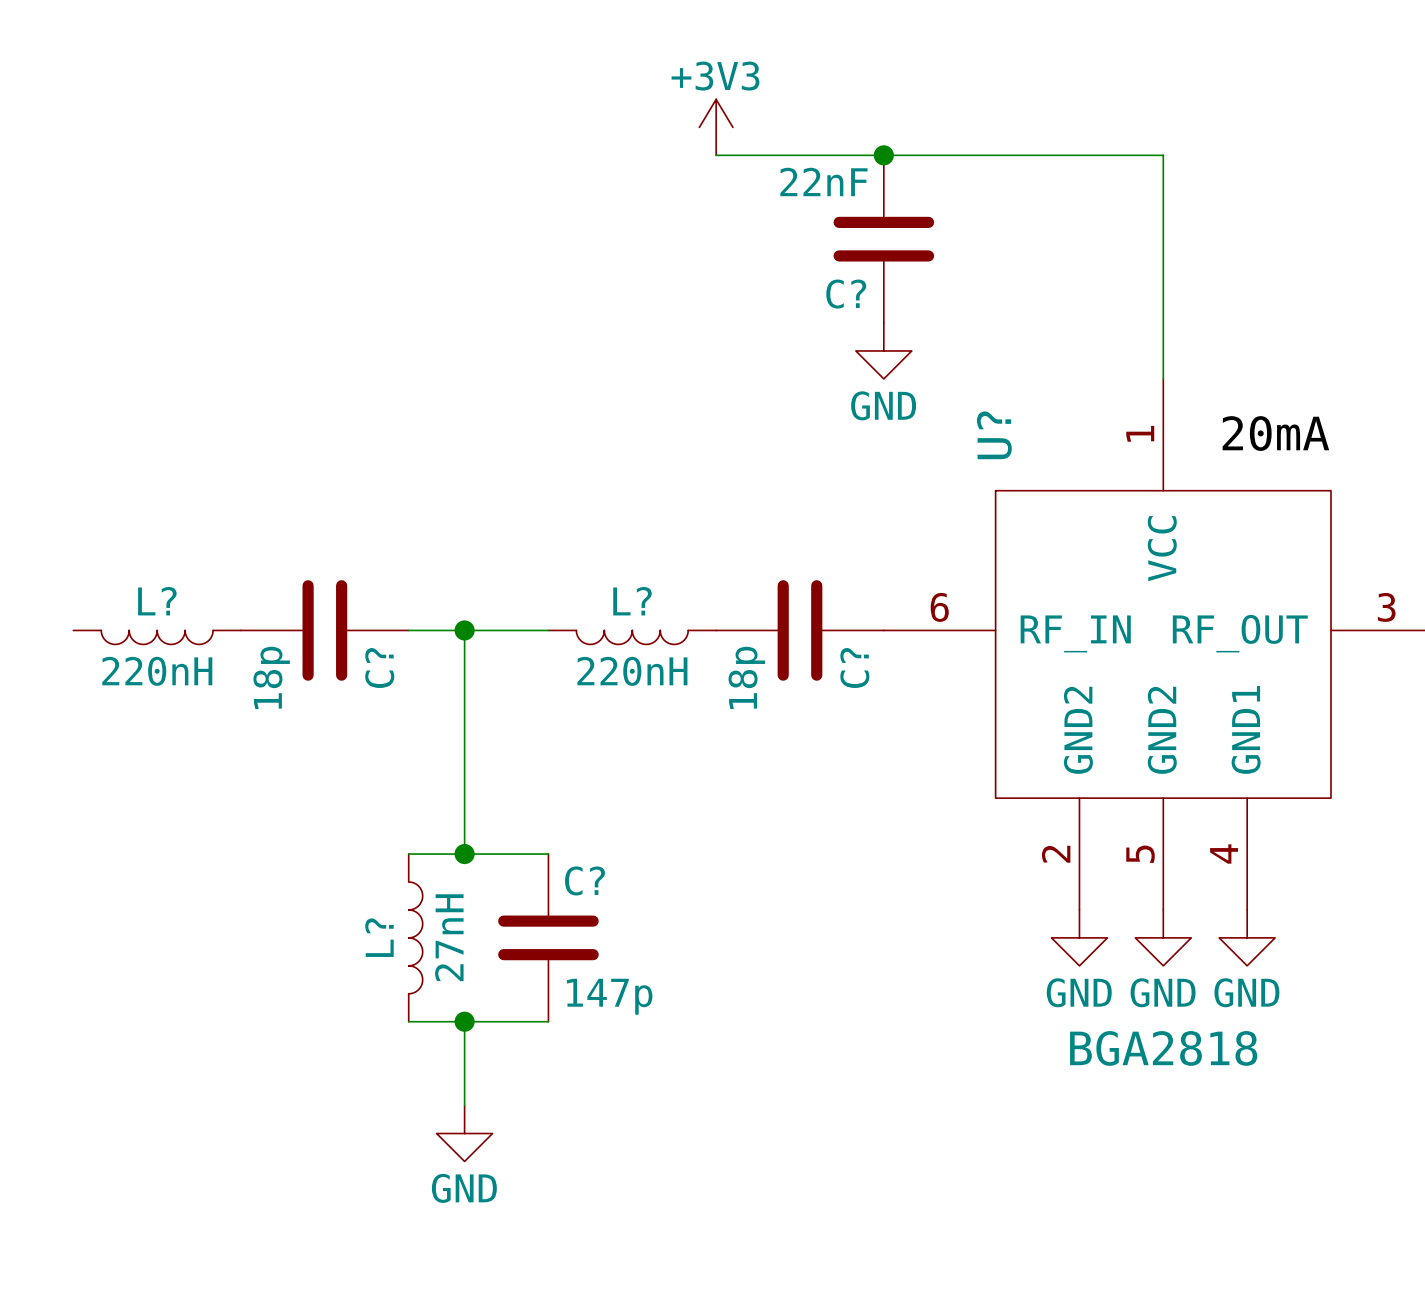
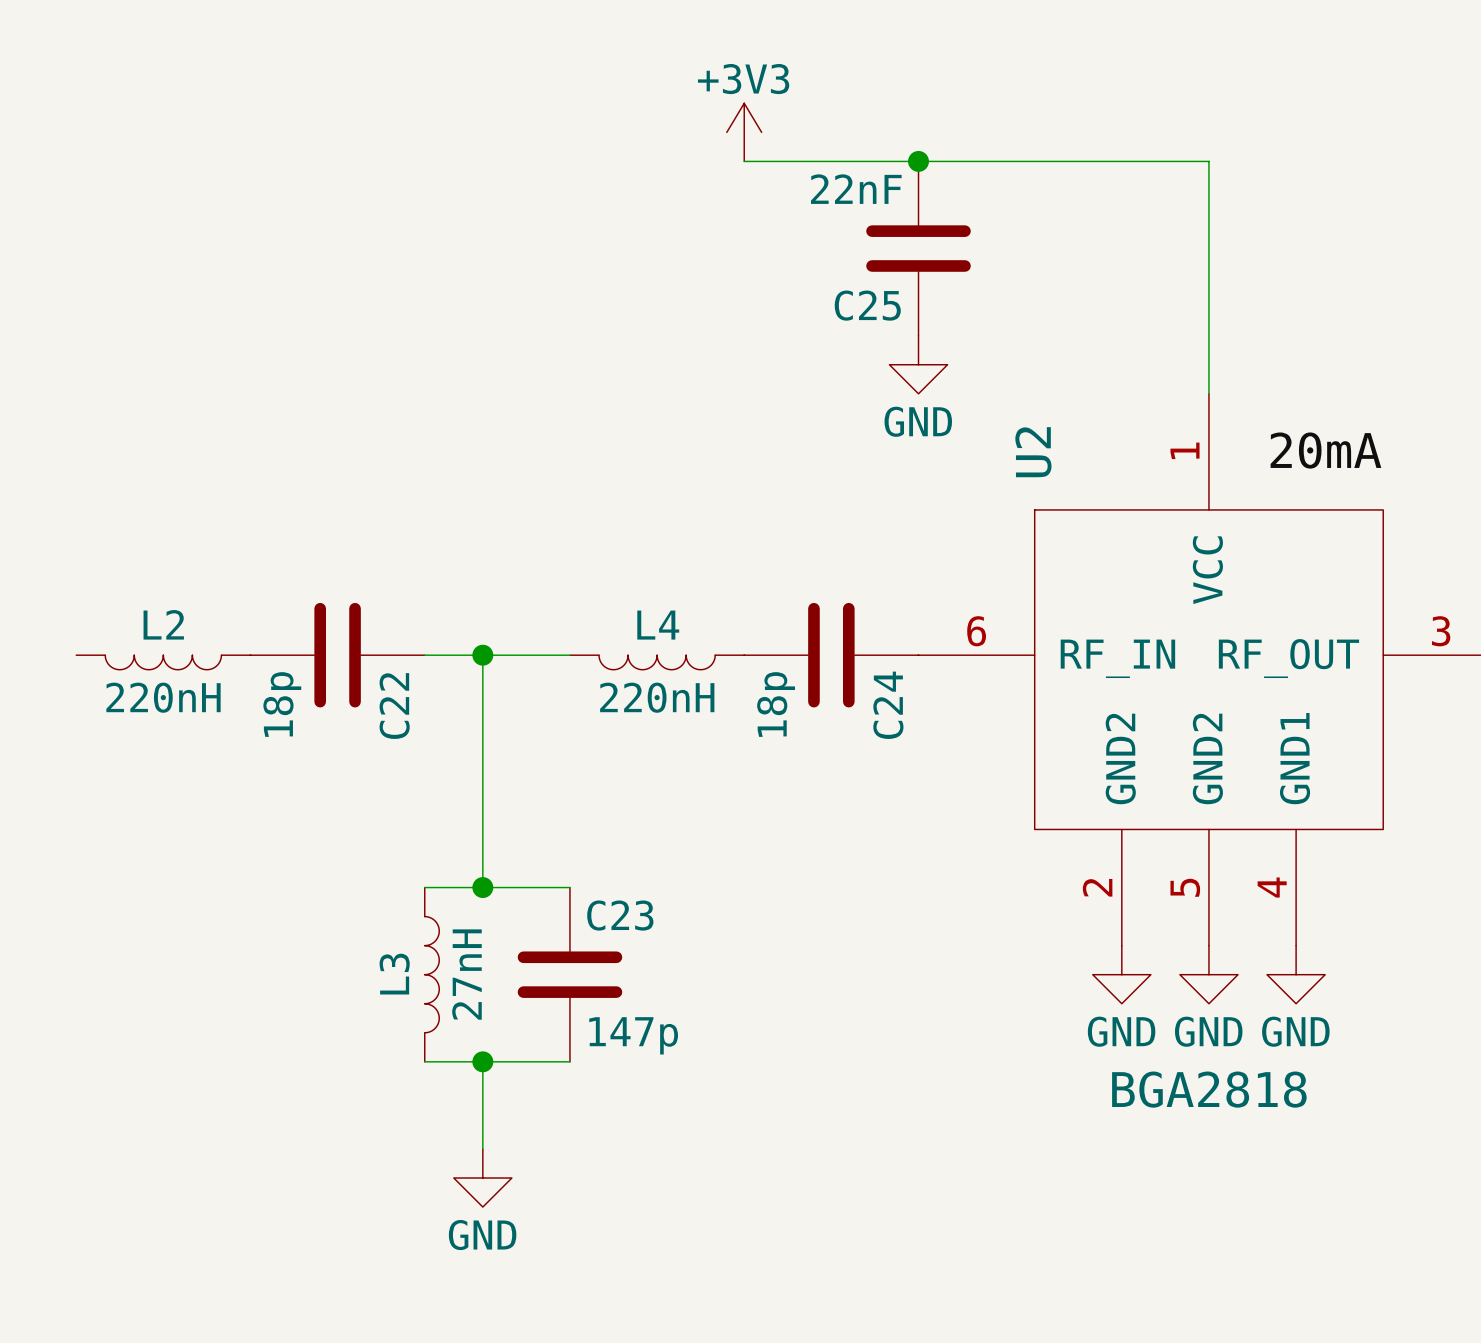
C? name: C? (846, 294) -> C25 (867, 305)
U? name: U? (994, 435) -> U2 (1033, 452)
L? name: L? (157, 601) -> L2 (163, 624)
L? name: L? (632, 601) -> L4 (658, 625)
C? name: C? (379, 668) -> C22 (394, 706)
C? name: C? (854, 668) -> C24 (888, 705)
C? name: C? (584, 880) -> C23 (620, 915)
L? name: L? (379, 937) -> L3 (394, 974)

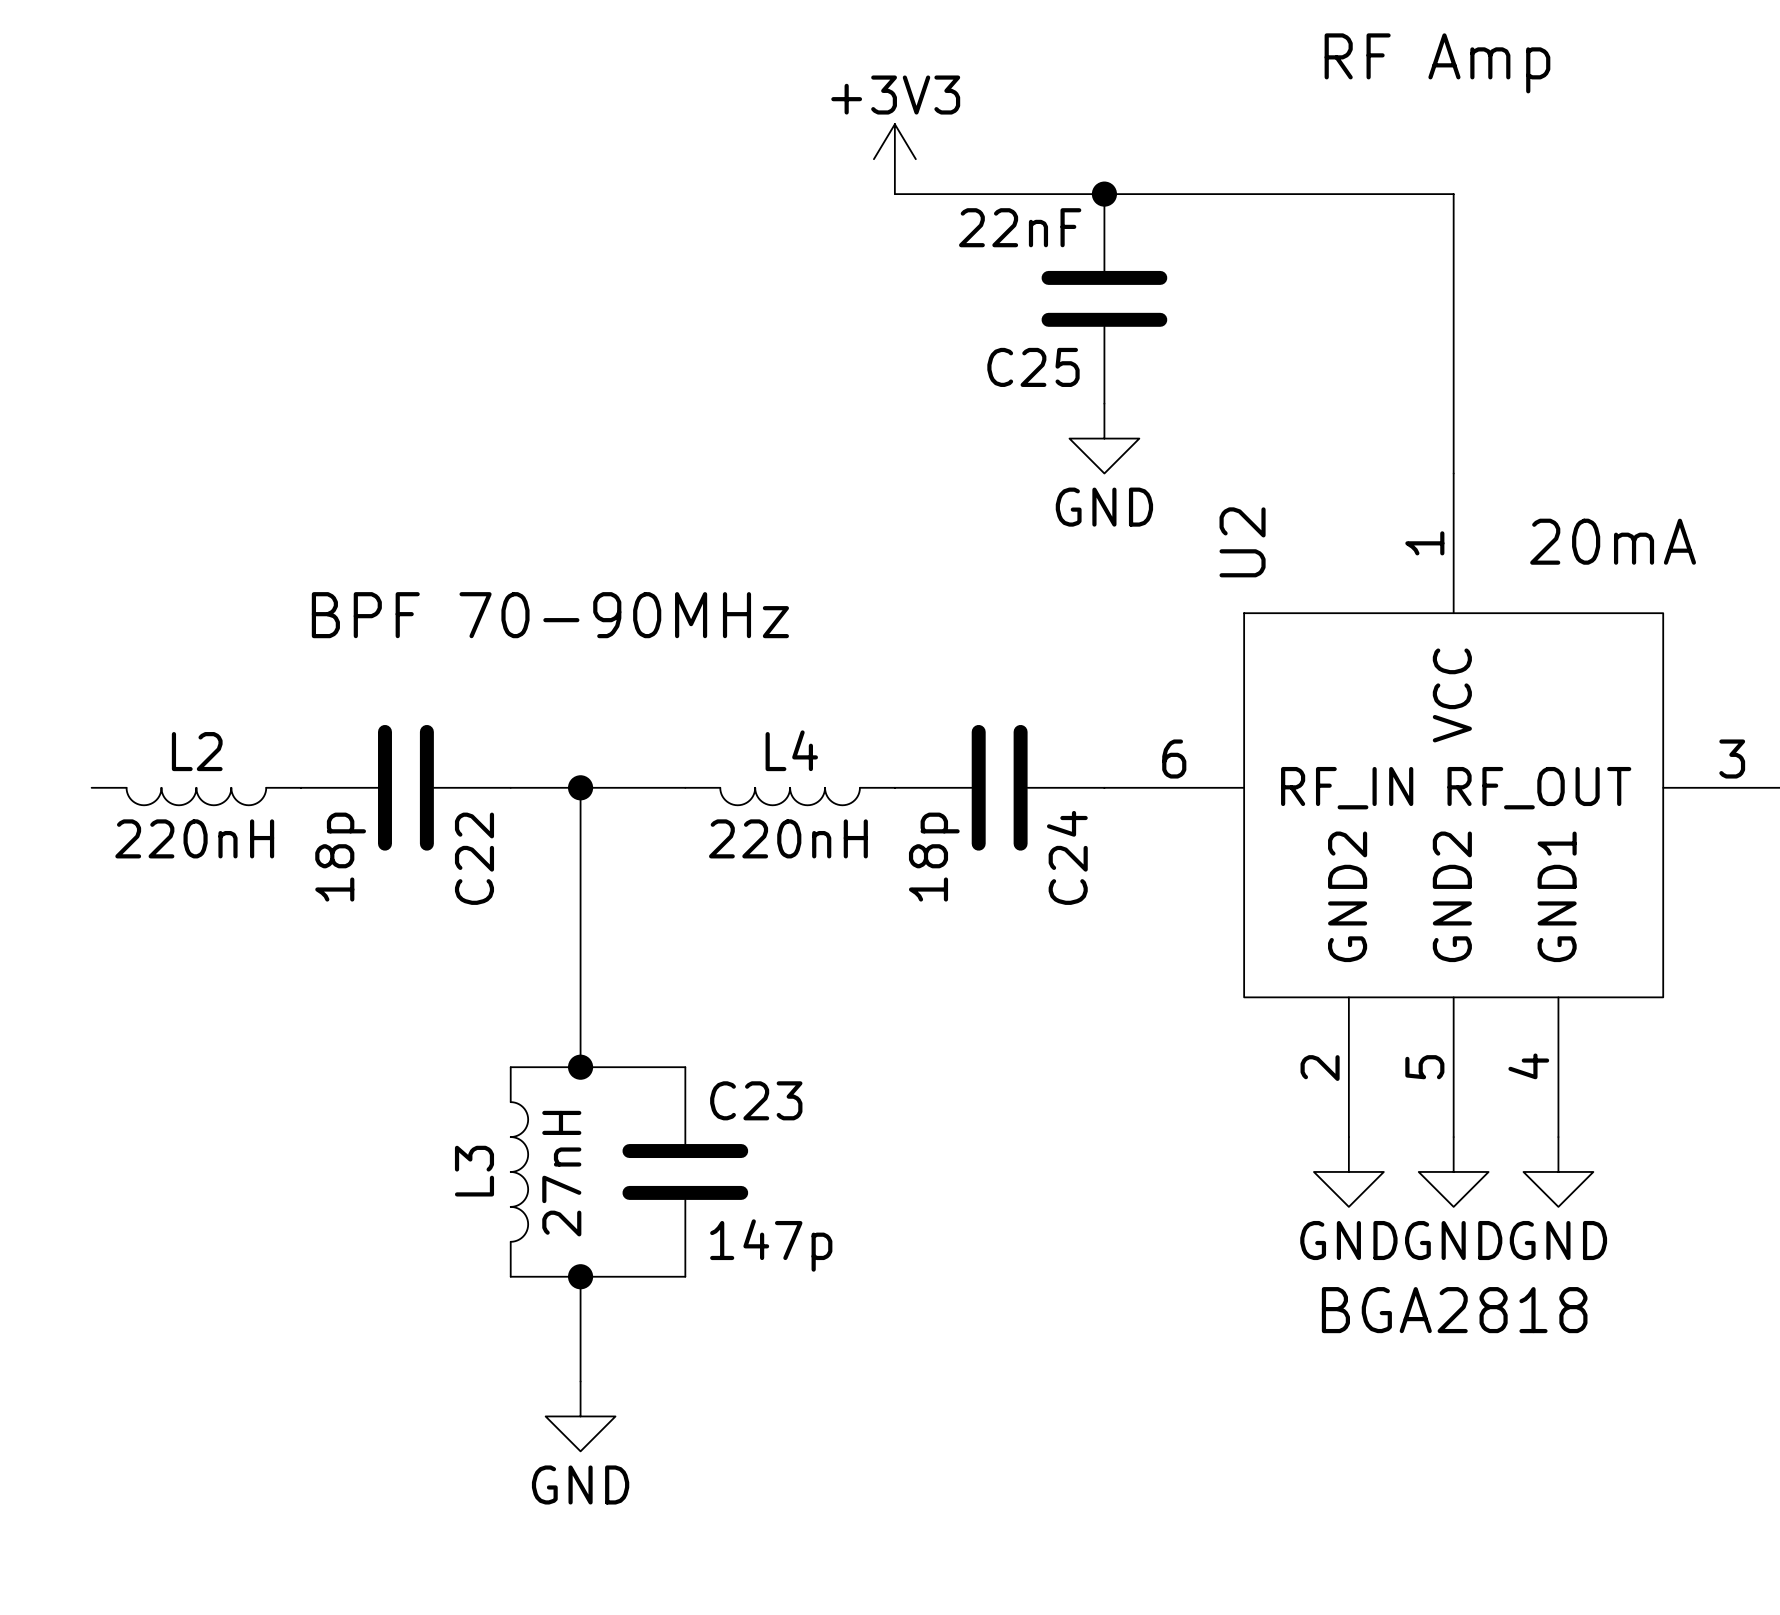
text: none -> RF Amp (1437, 63)
text: none -> BPF 70-90MHz (550, 615)

